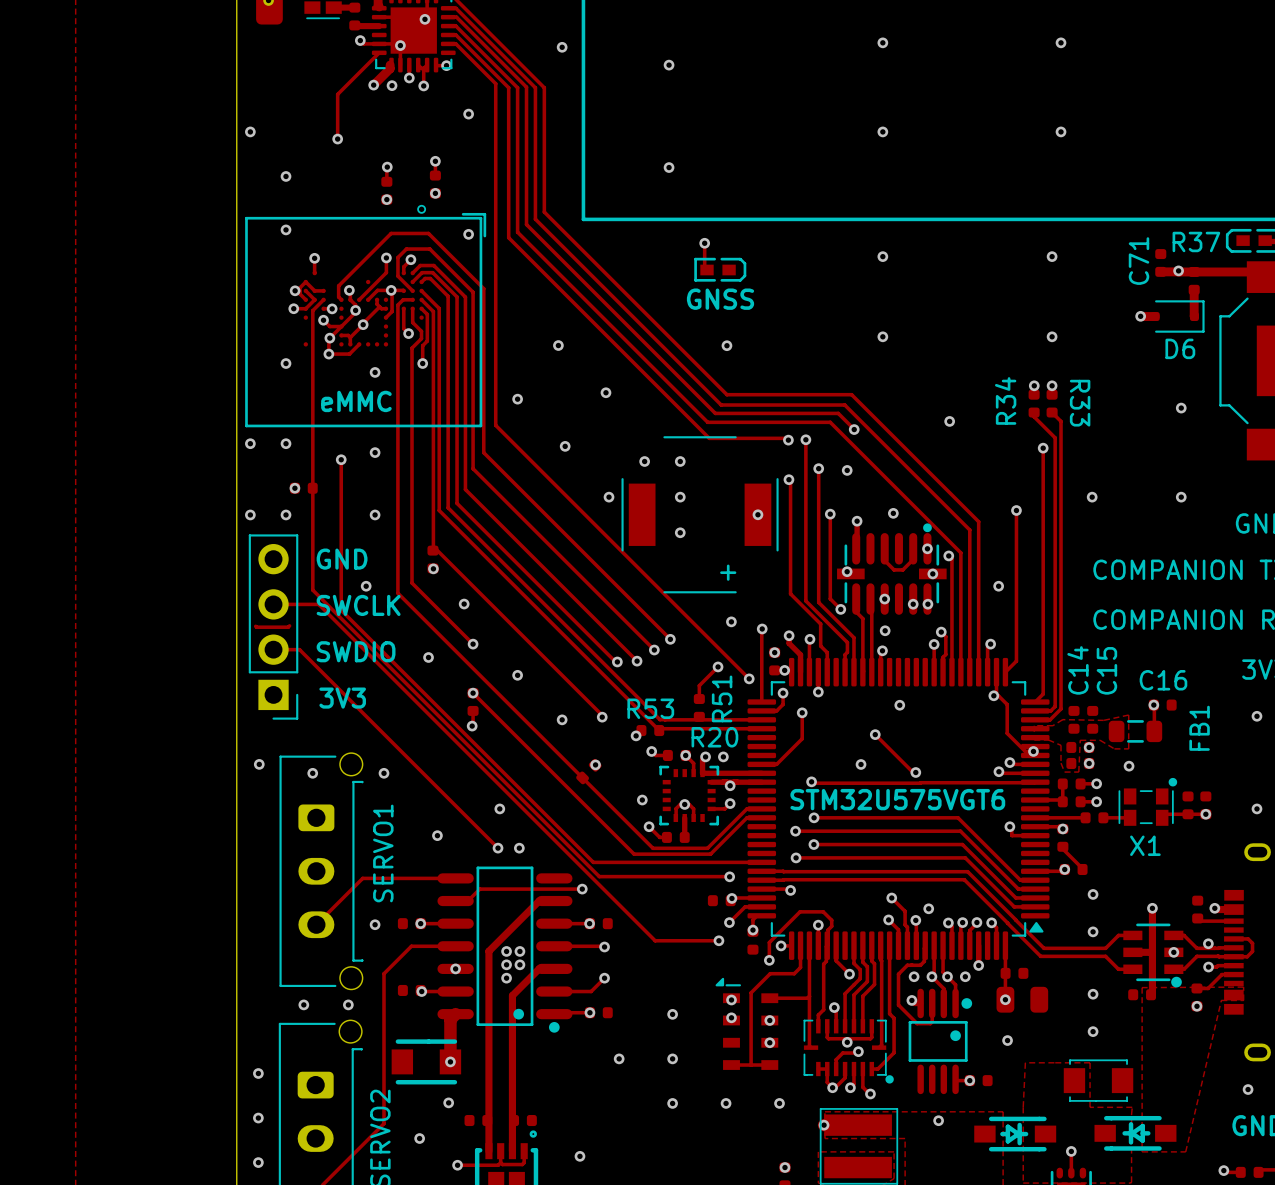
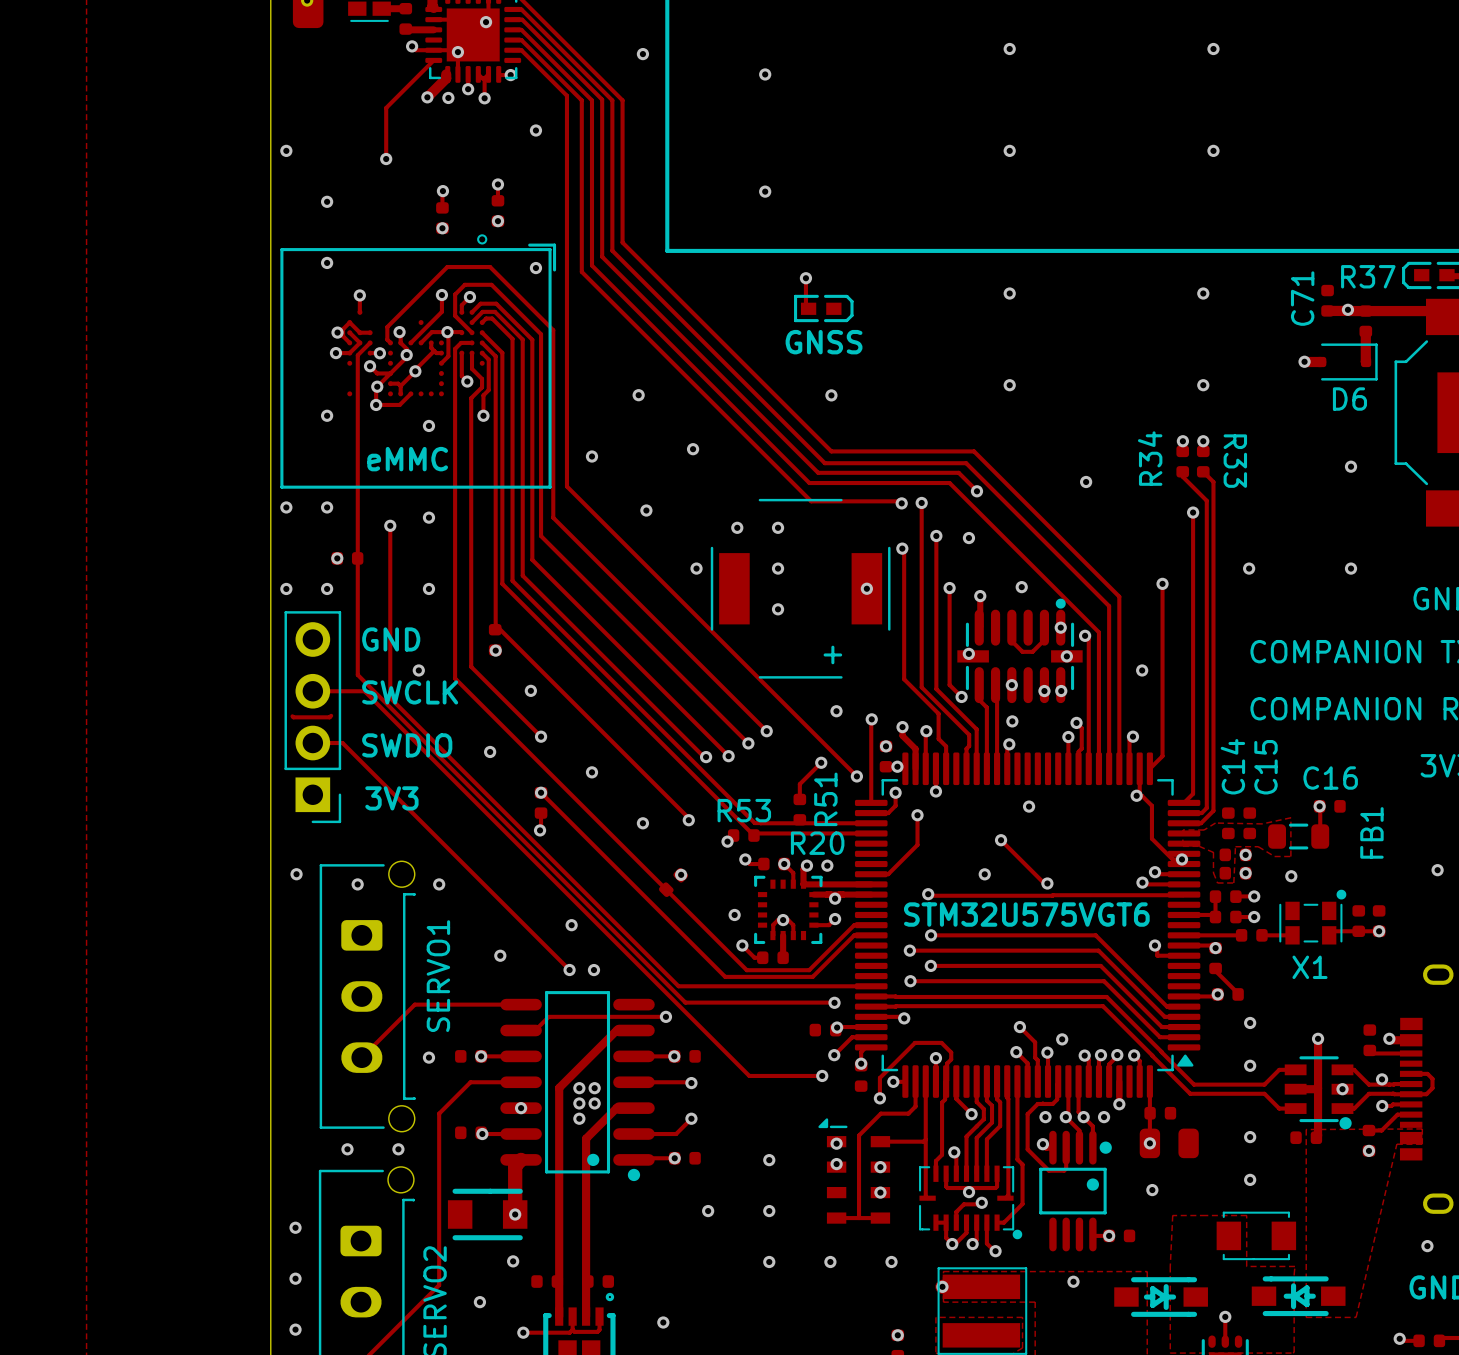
via: (1256, 716) -> none
via: none -> (1437, 870)
via: (1256, 808) -> none

